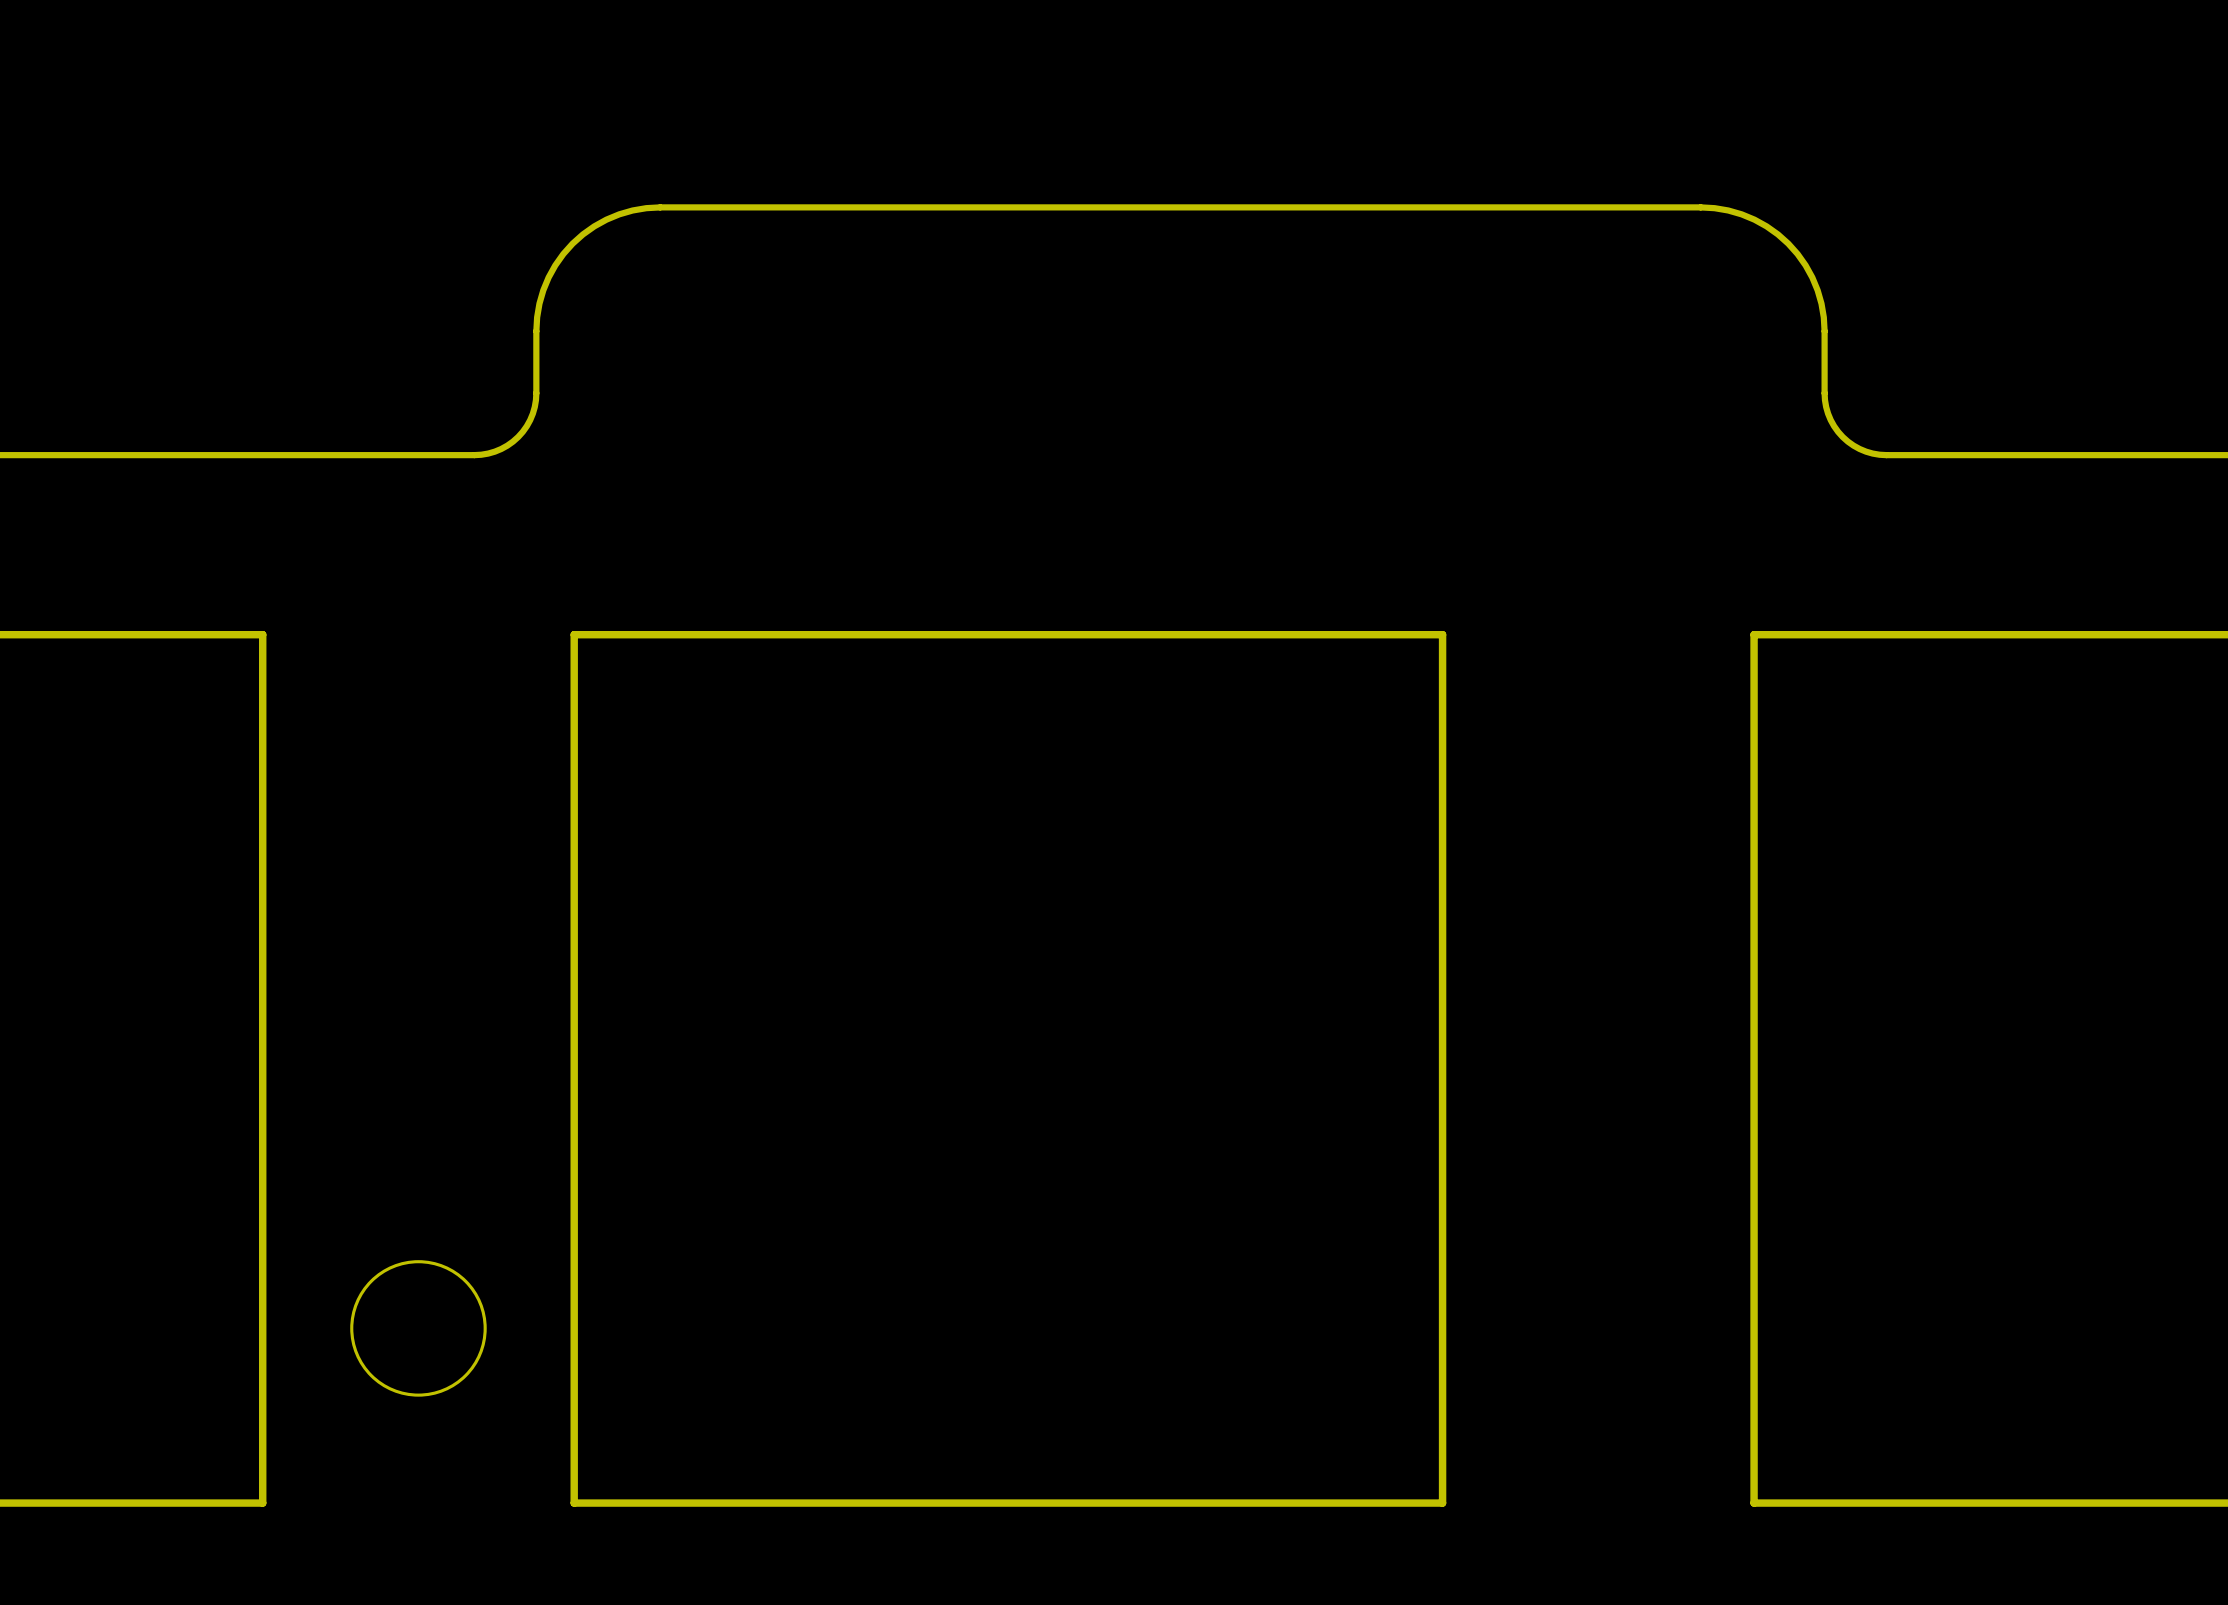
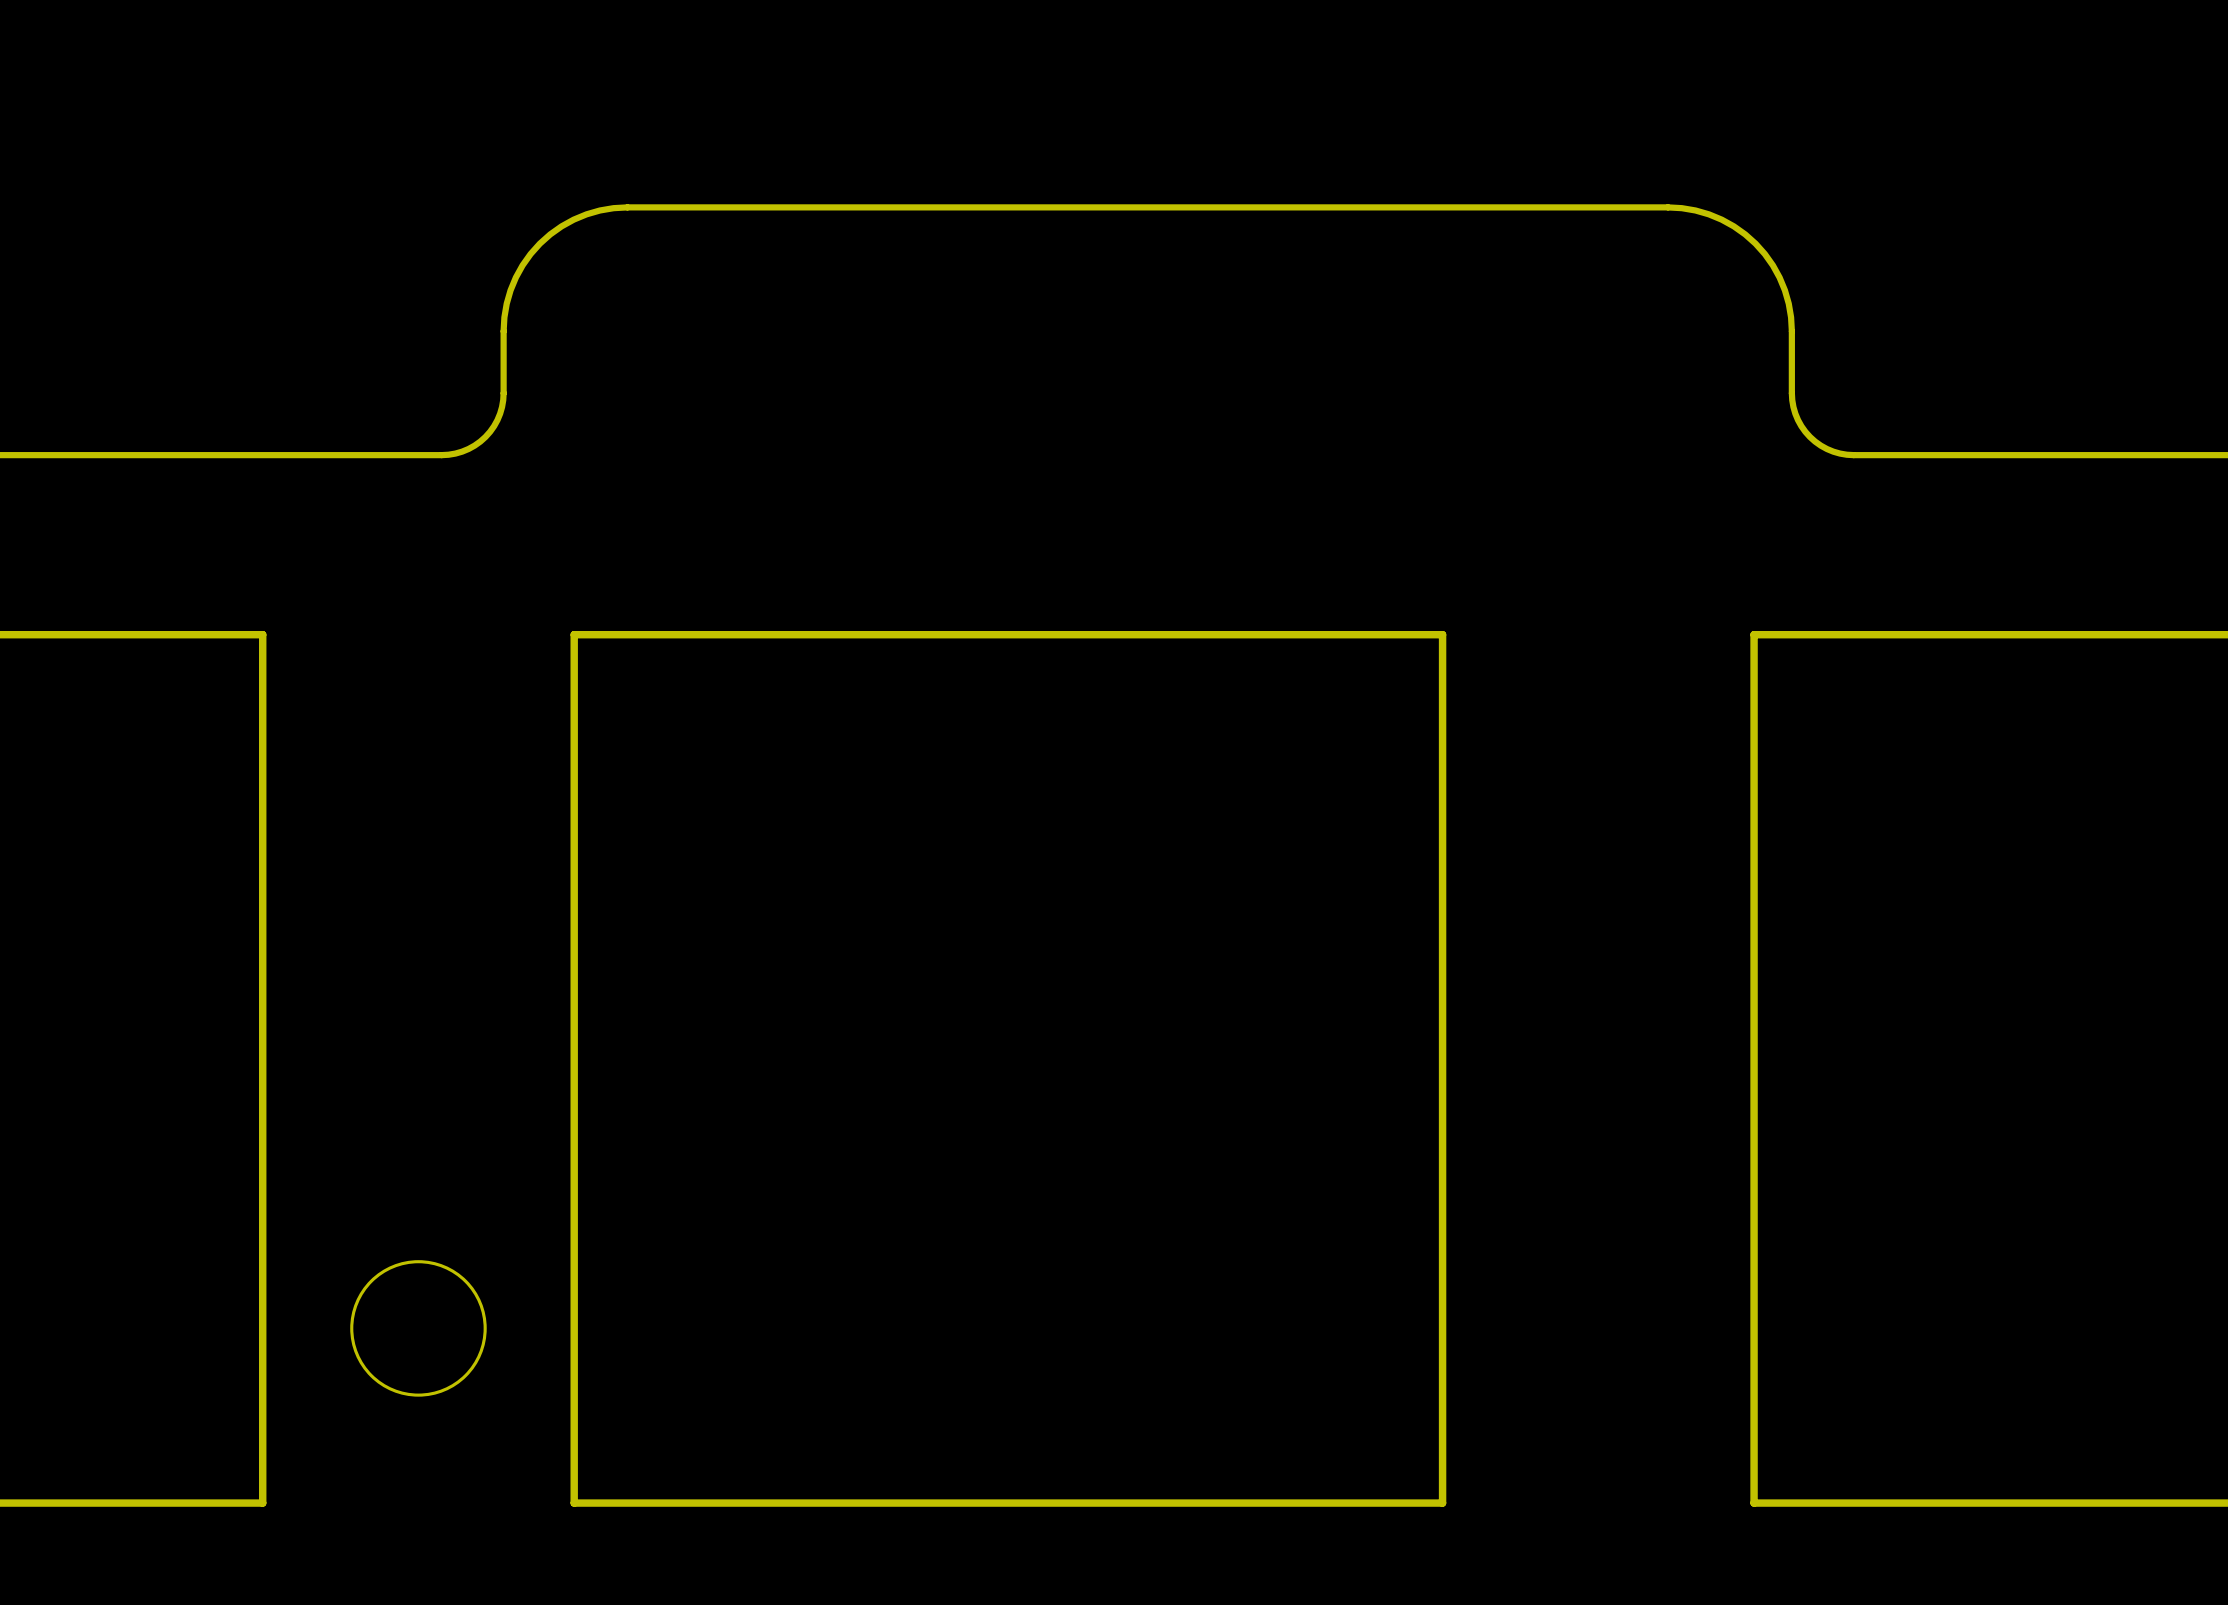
board edge: (660, 207) (632, 210) (606, 219) (582, 234) (572, 243) (555, 265) (548, 277) (539, 303) (536, 331) (535, 400) (532, 413) (522, 431) (507, 445) (488, 453) (441, 455) -> (660, 207) (613, 208) (586, 214) (561, 226) (550, 234) (530, 254) (515, 277) (506, 303) (503, 331) (503, 400) (497, 420) (485, 436) (474, 445) (462, 451) (441, 455)
board edge: (1668, 207) (1714, 208) (1741, 214) (1754, 219) (1777, 234) (1797, 254) (1812, 277) (1821, 303) (1824, 331) (1824, 400) (1830, 420) (1842, 436) (1853, 445) (1872, 453) (1886, 455) -> (1668, 207) (1695, 210) (1721, 219) (1745, 234) (1764, 254) (1772, 265) (1779, 277) (1788, 303) (1791, 331) (1792, 400) (1795, 413) (1805, 431) (1820, 445) (1840, 453) (1886, 455)

